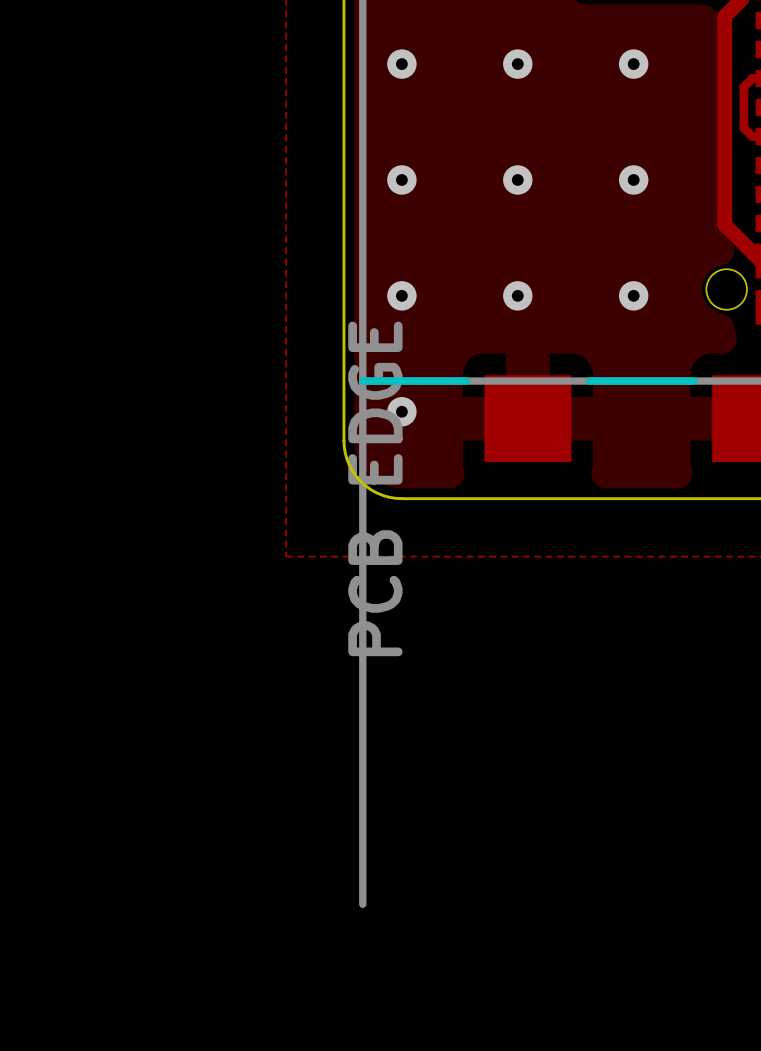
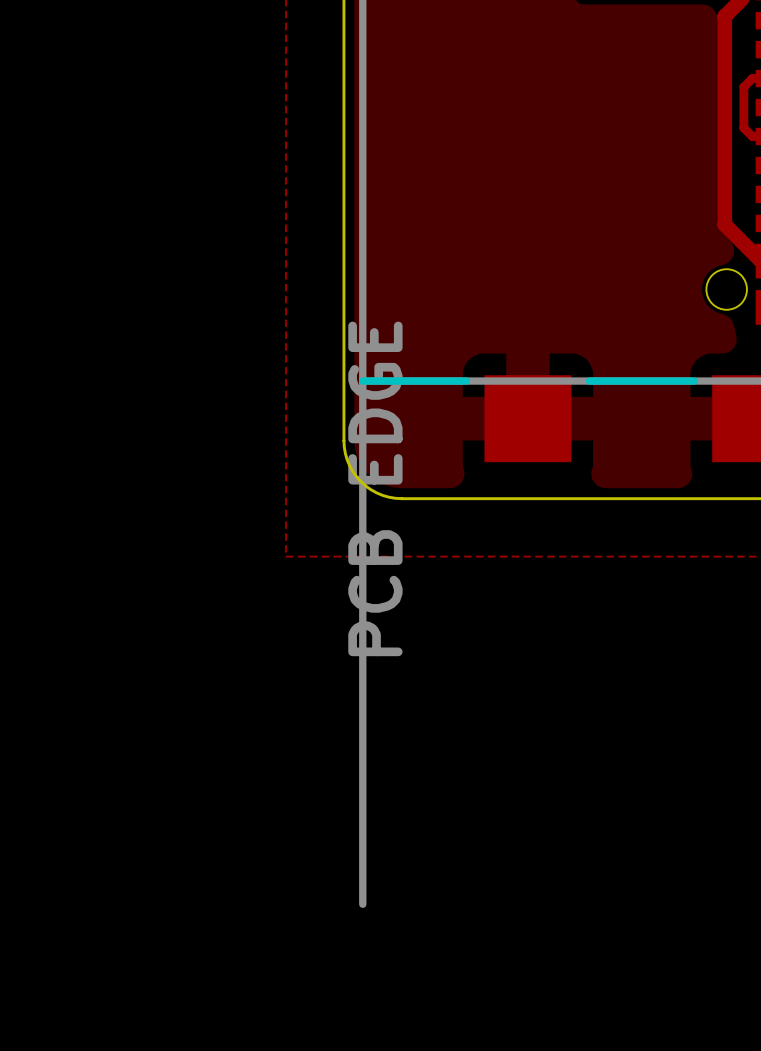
via: (401, 64) -> none
via: (517, 64) -> none
via: (633, 64) -> none
via: (401, 179) -> none
via: (517, 179) -> none
via: (633, 179) -> none
via: (401, 295) -> none
via: (517, 295) -> none
via: (633, 295) -> none
via: (401, 411) -> none

